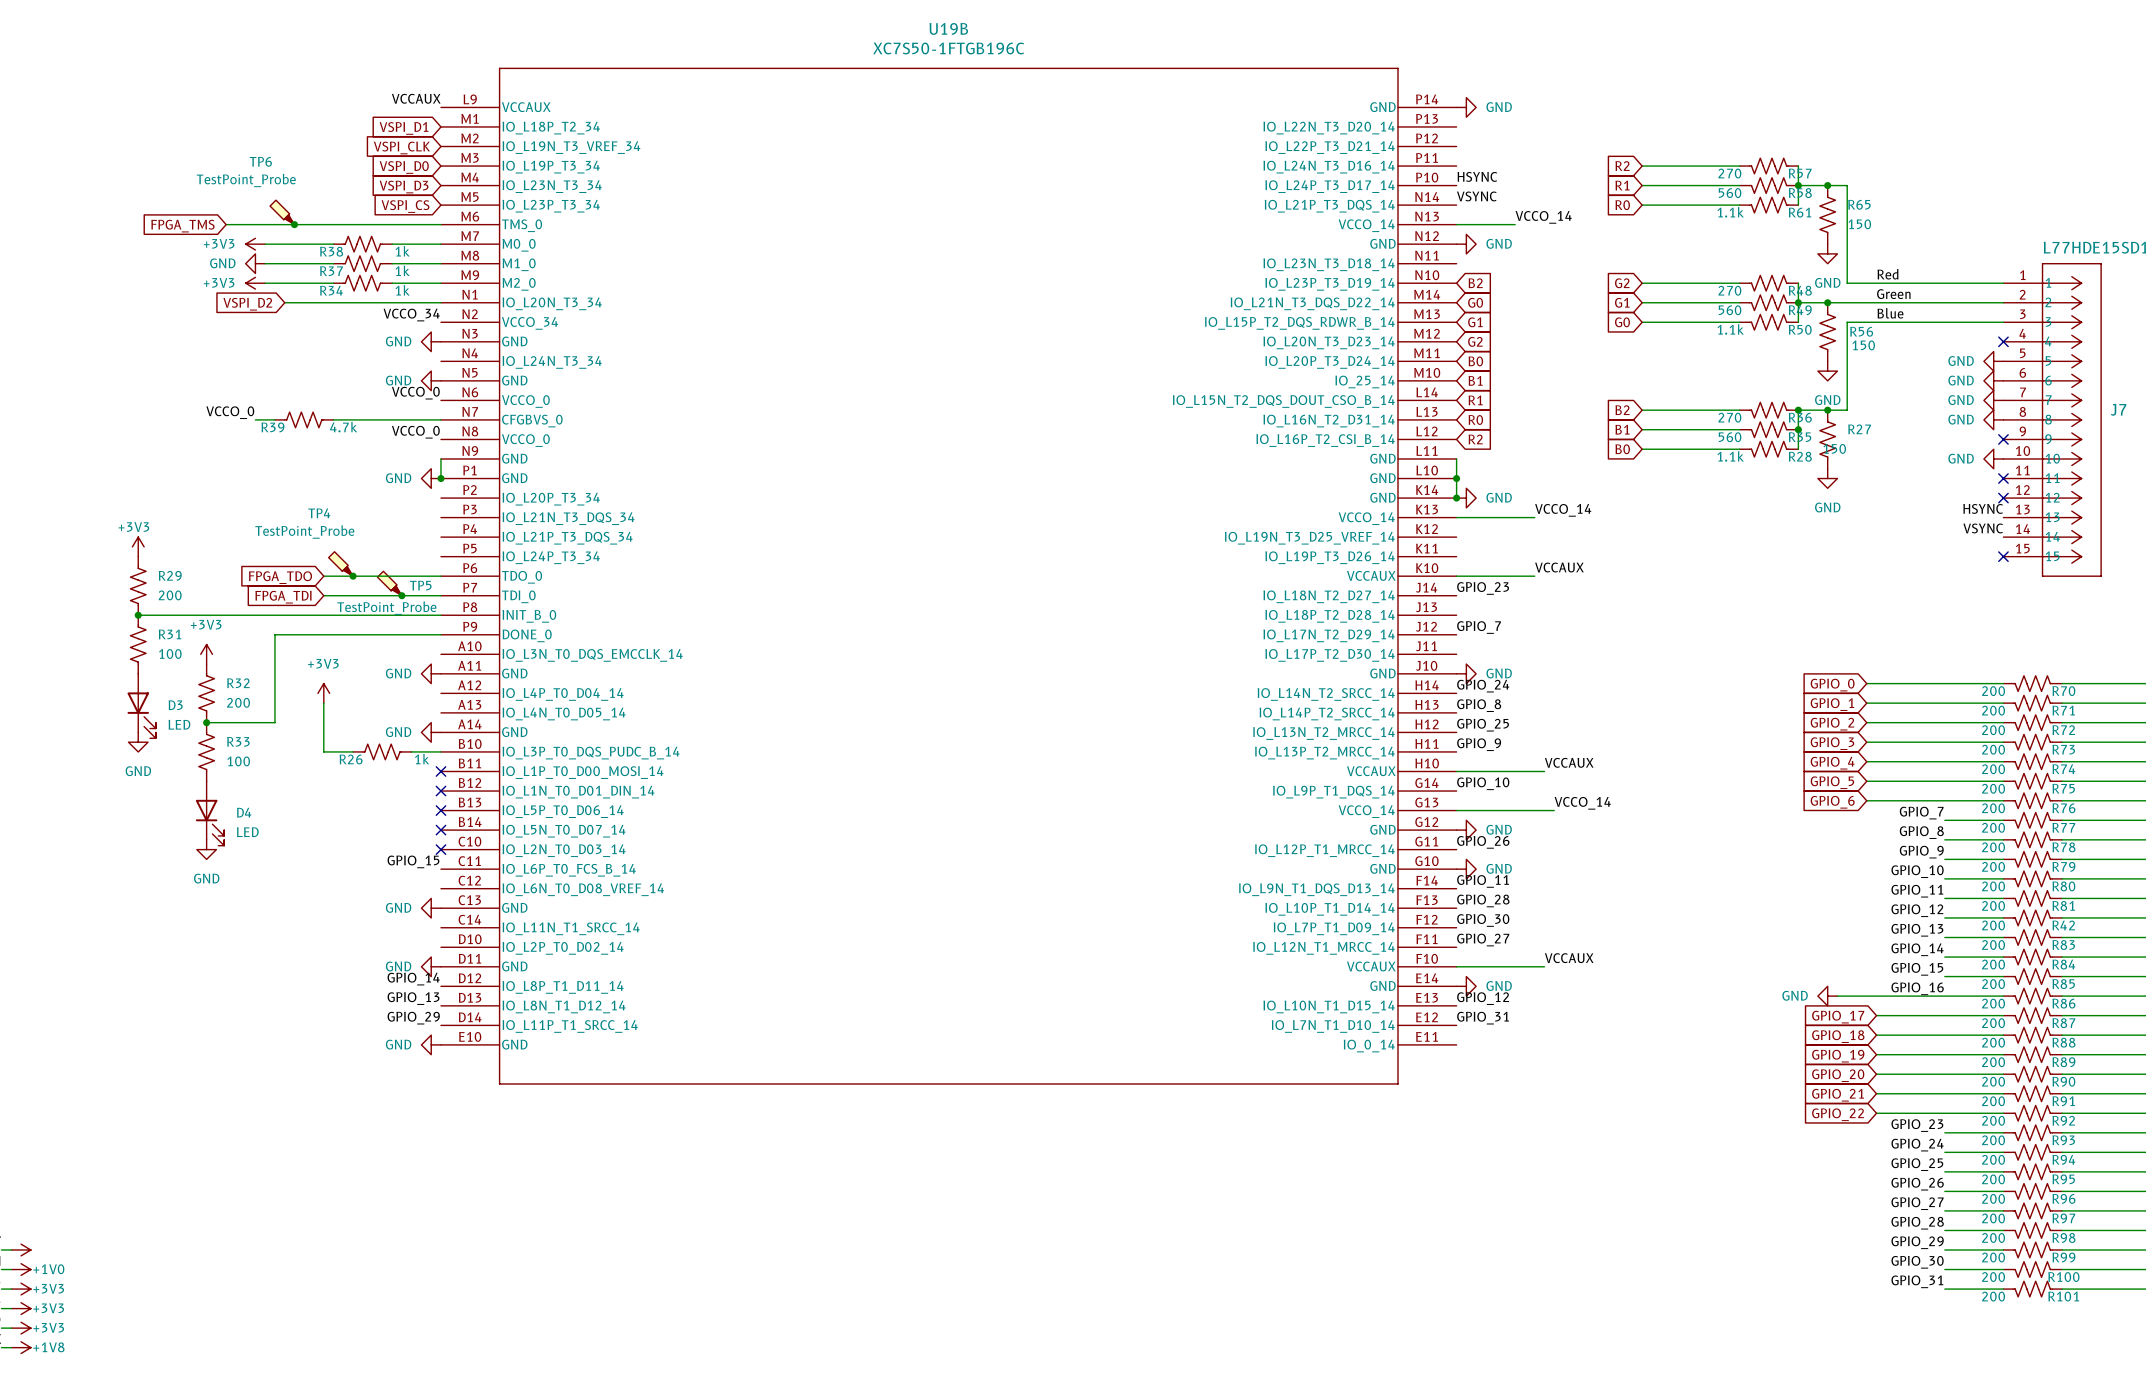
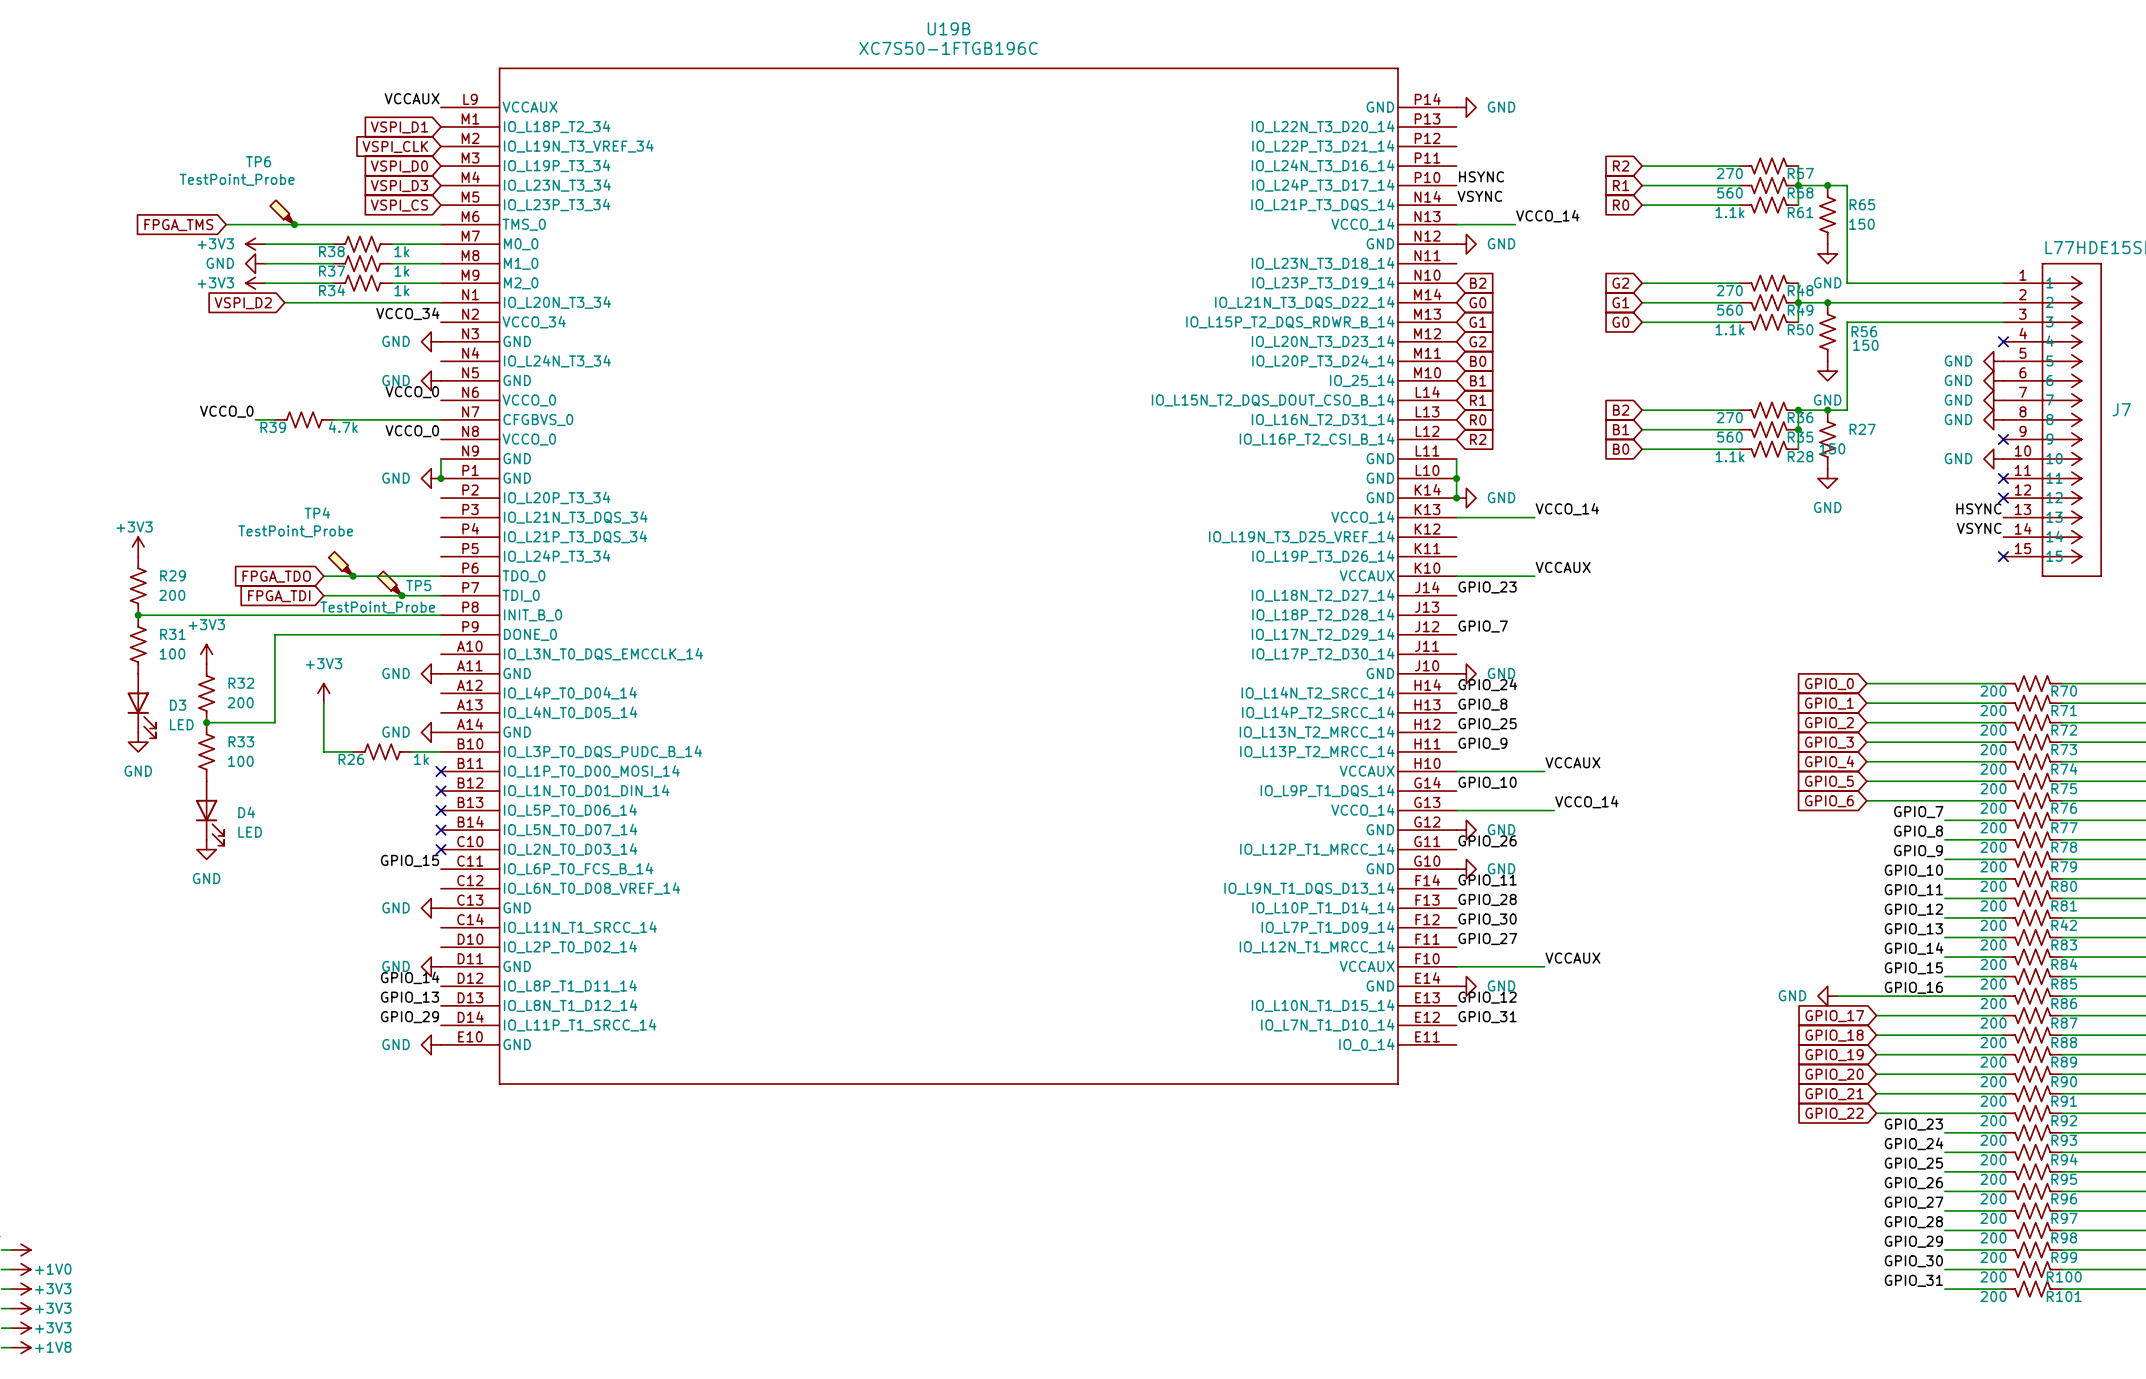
label: Red (1887, 274) -> none
label: Green (1893, 294) -> none
label: Blue (1890, 313) -> none

